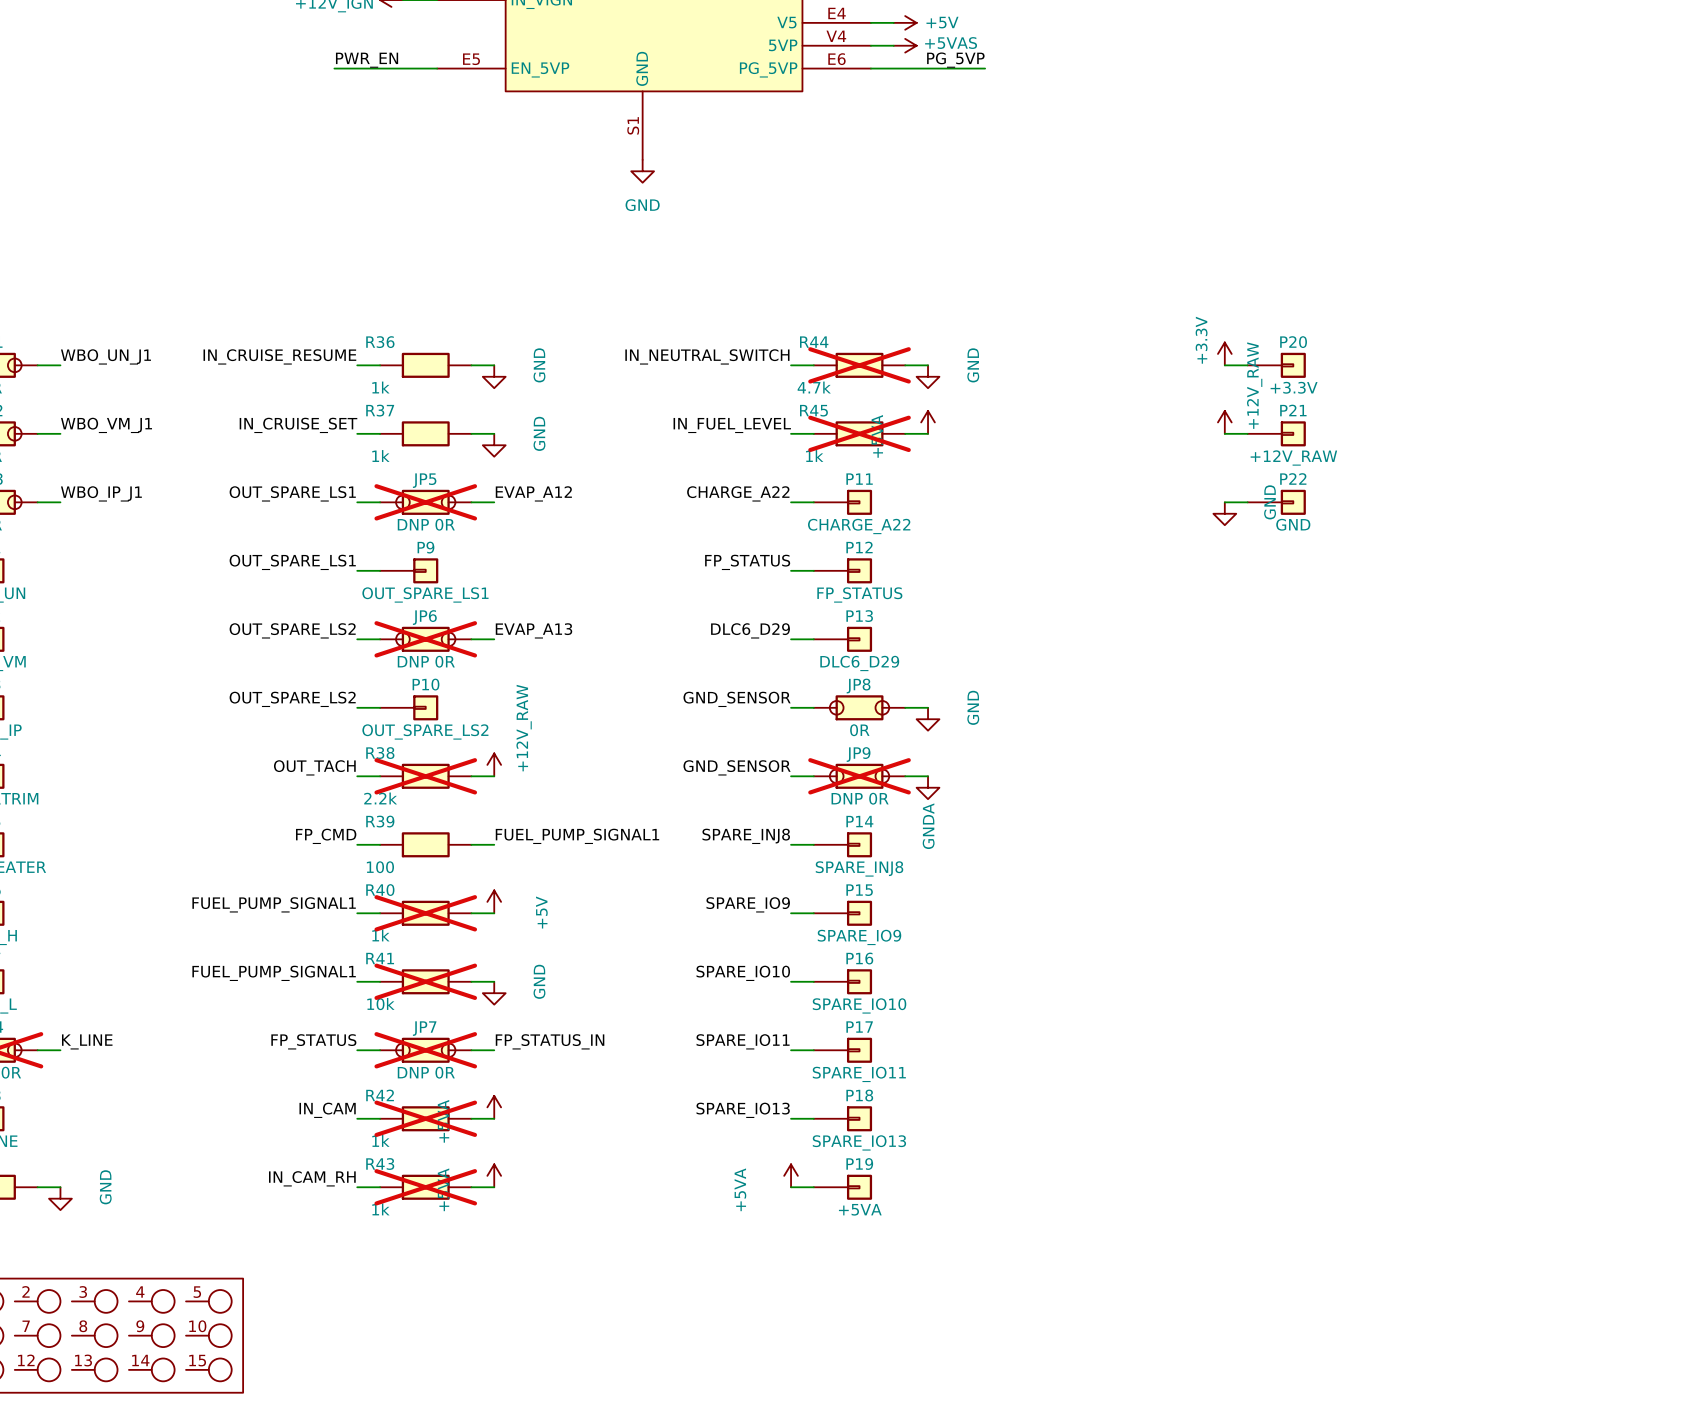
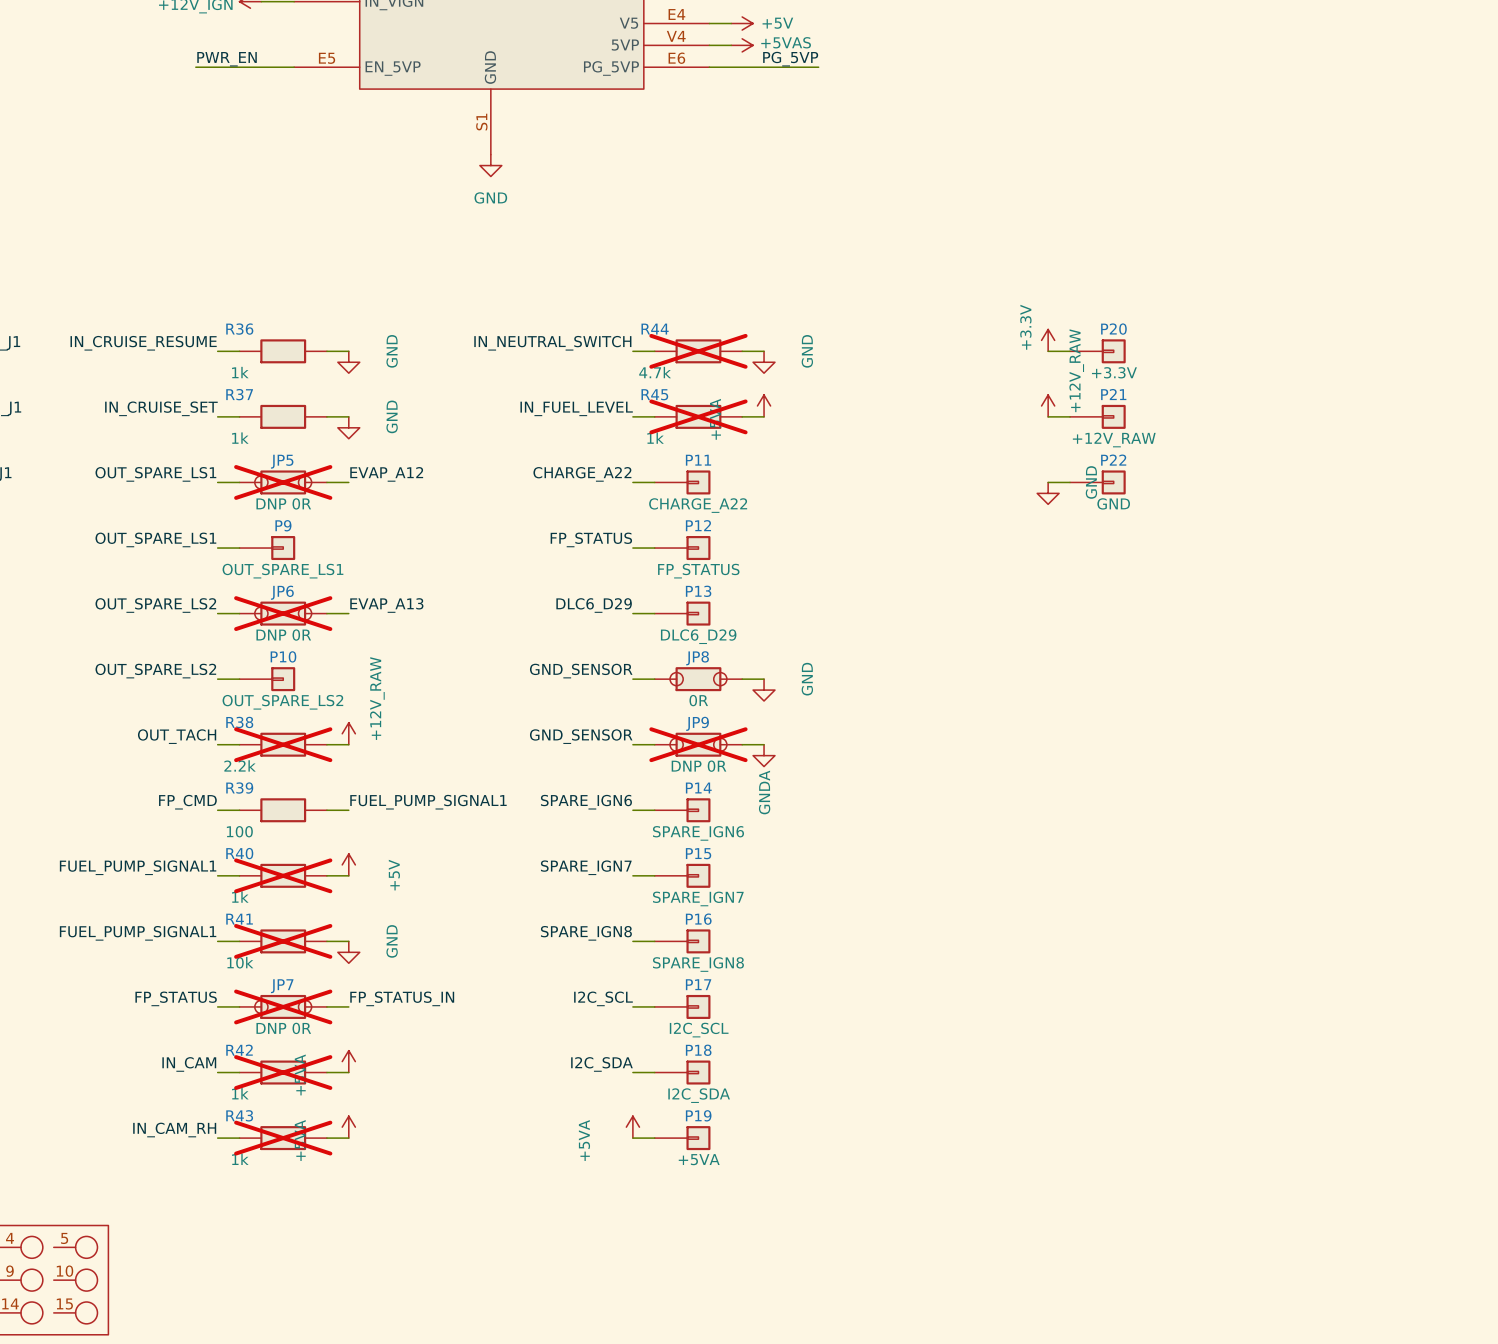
label: SPARE_INJ8 (746, 836) -> SPARE_IGN6 (586, 802)
P14 value: SPARE_INJ8 (859, 868) -> SPARE_IGN6 (698, 833)
label: SPARE_IO9 (748, 904) -> SPARE_IGN7 (586, 867)
P15 value: SPARE_IO9 (859, 937) -> SPARE_IGN7 (698, 898)
label: SPARE_IO10 (743, 973) -> SPARE_IGN8 (586, 933)
P16 value: SPARE_IO10 (859, 1005) -> SPARE_IGN8 (698, 964)
label: SPARE_IO11 (743, 1041) -> I2C_SCL (603, 998)
P17 value: SPARE_IO11 (859, 1074) -> I2C_SCL (699, 1030)
label: SPARE_IO13 (743, 1110) -> I2C_SDA (601, 1064)
P18 value: SPARE_IO13 (859, 1142) -> I2C_SDA (699, 1095)

